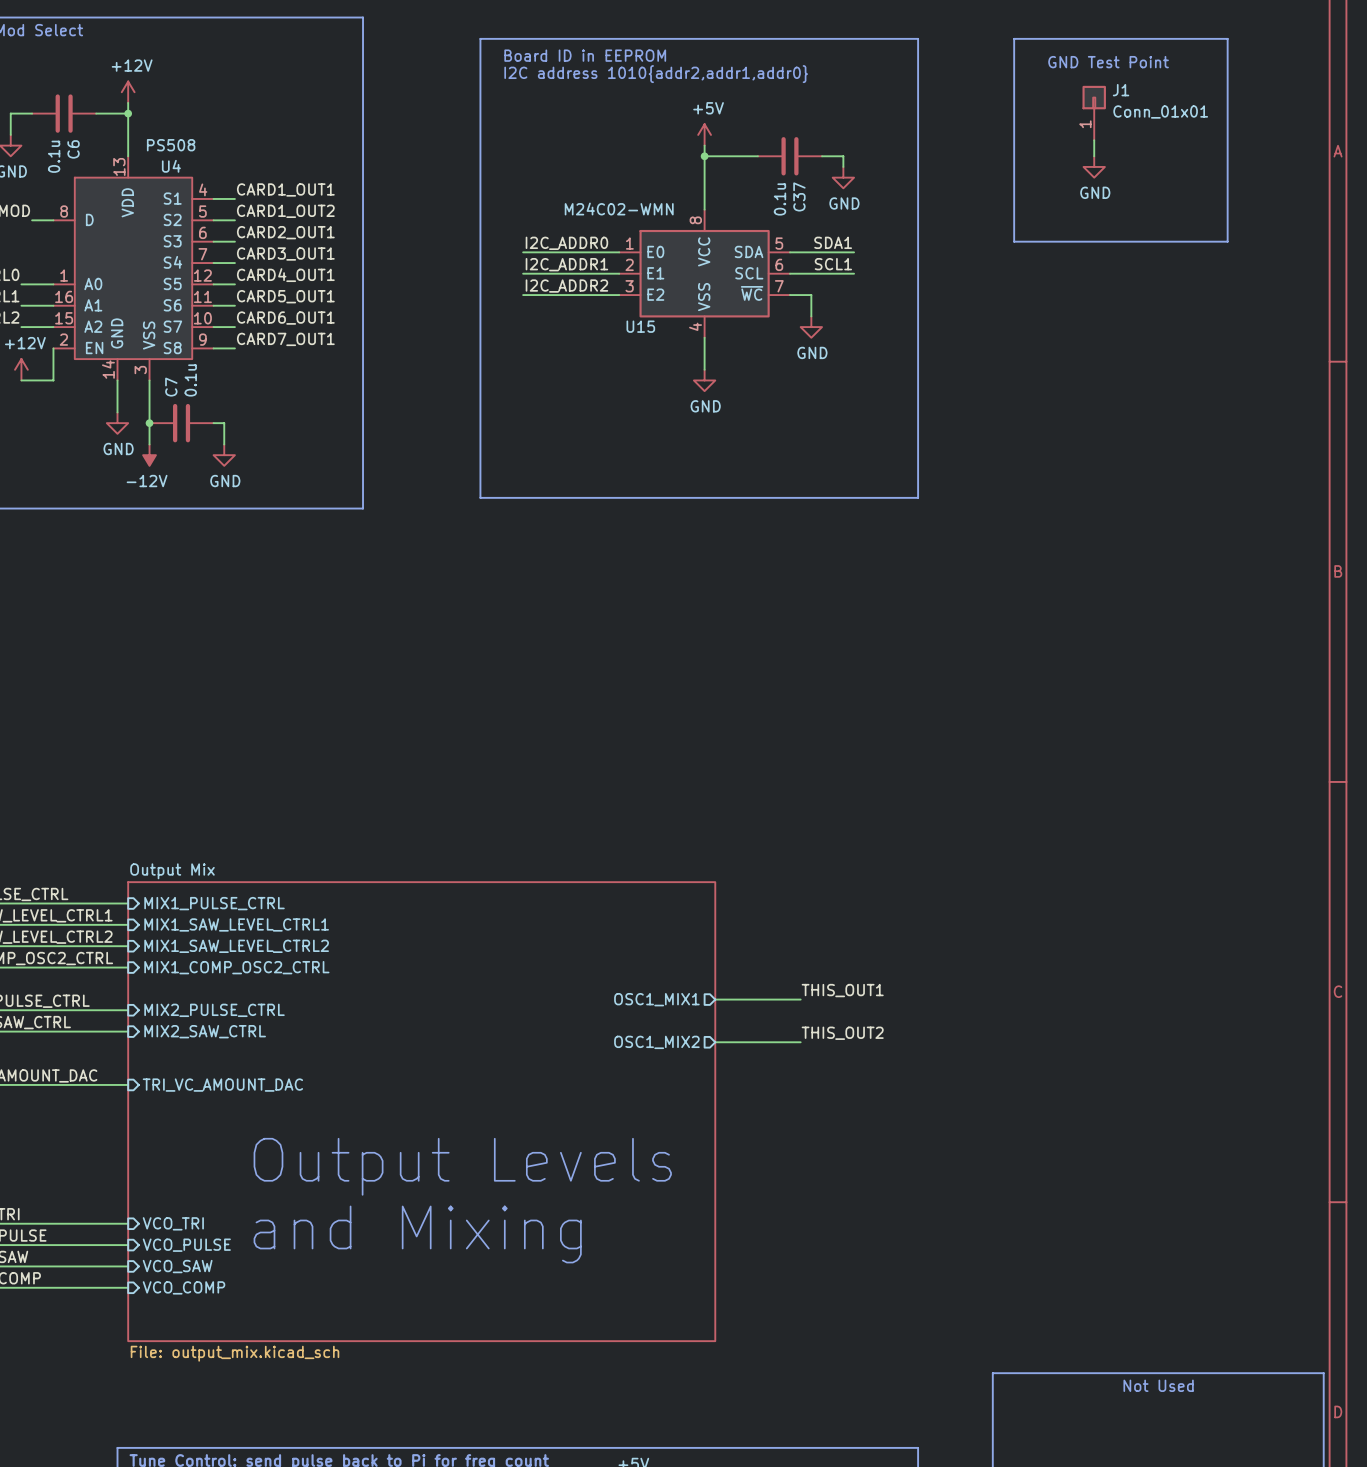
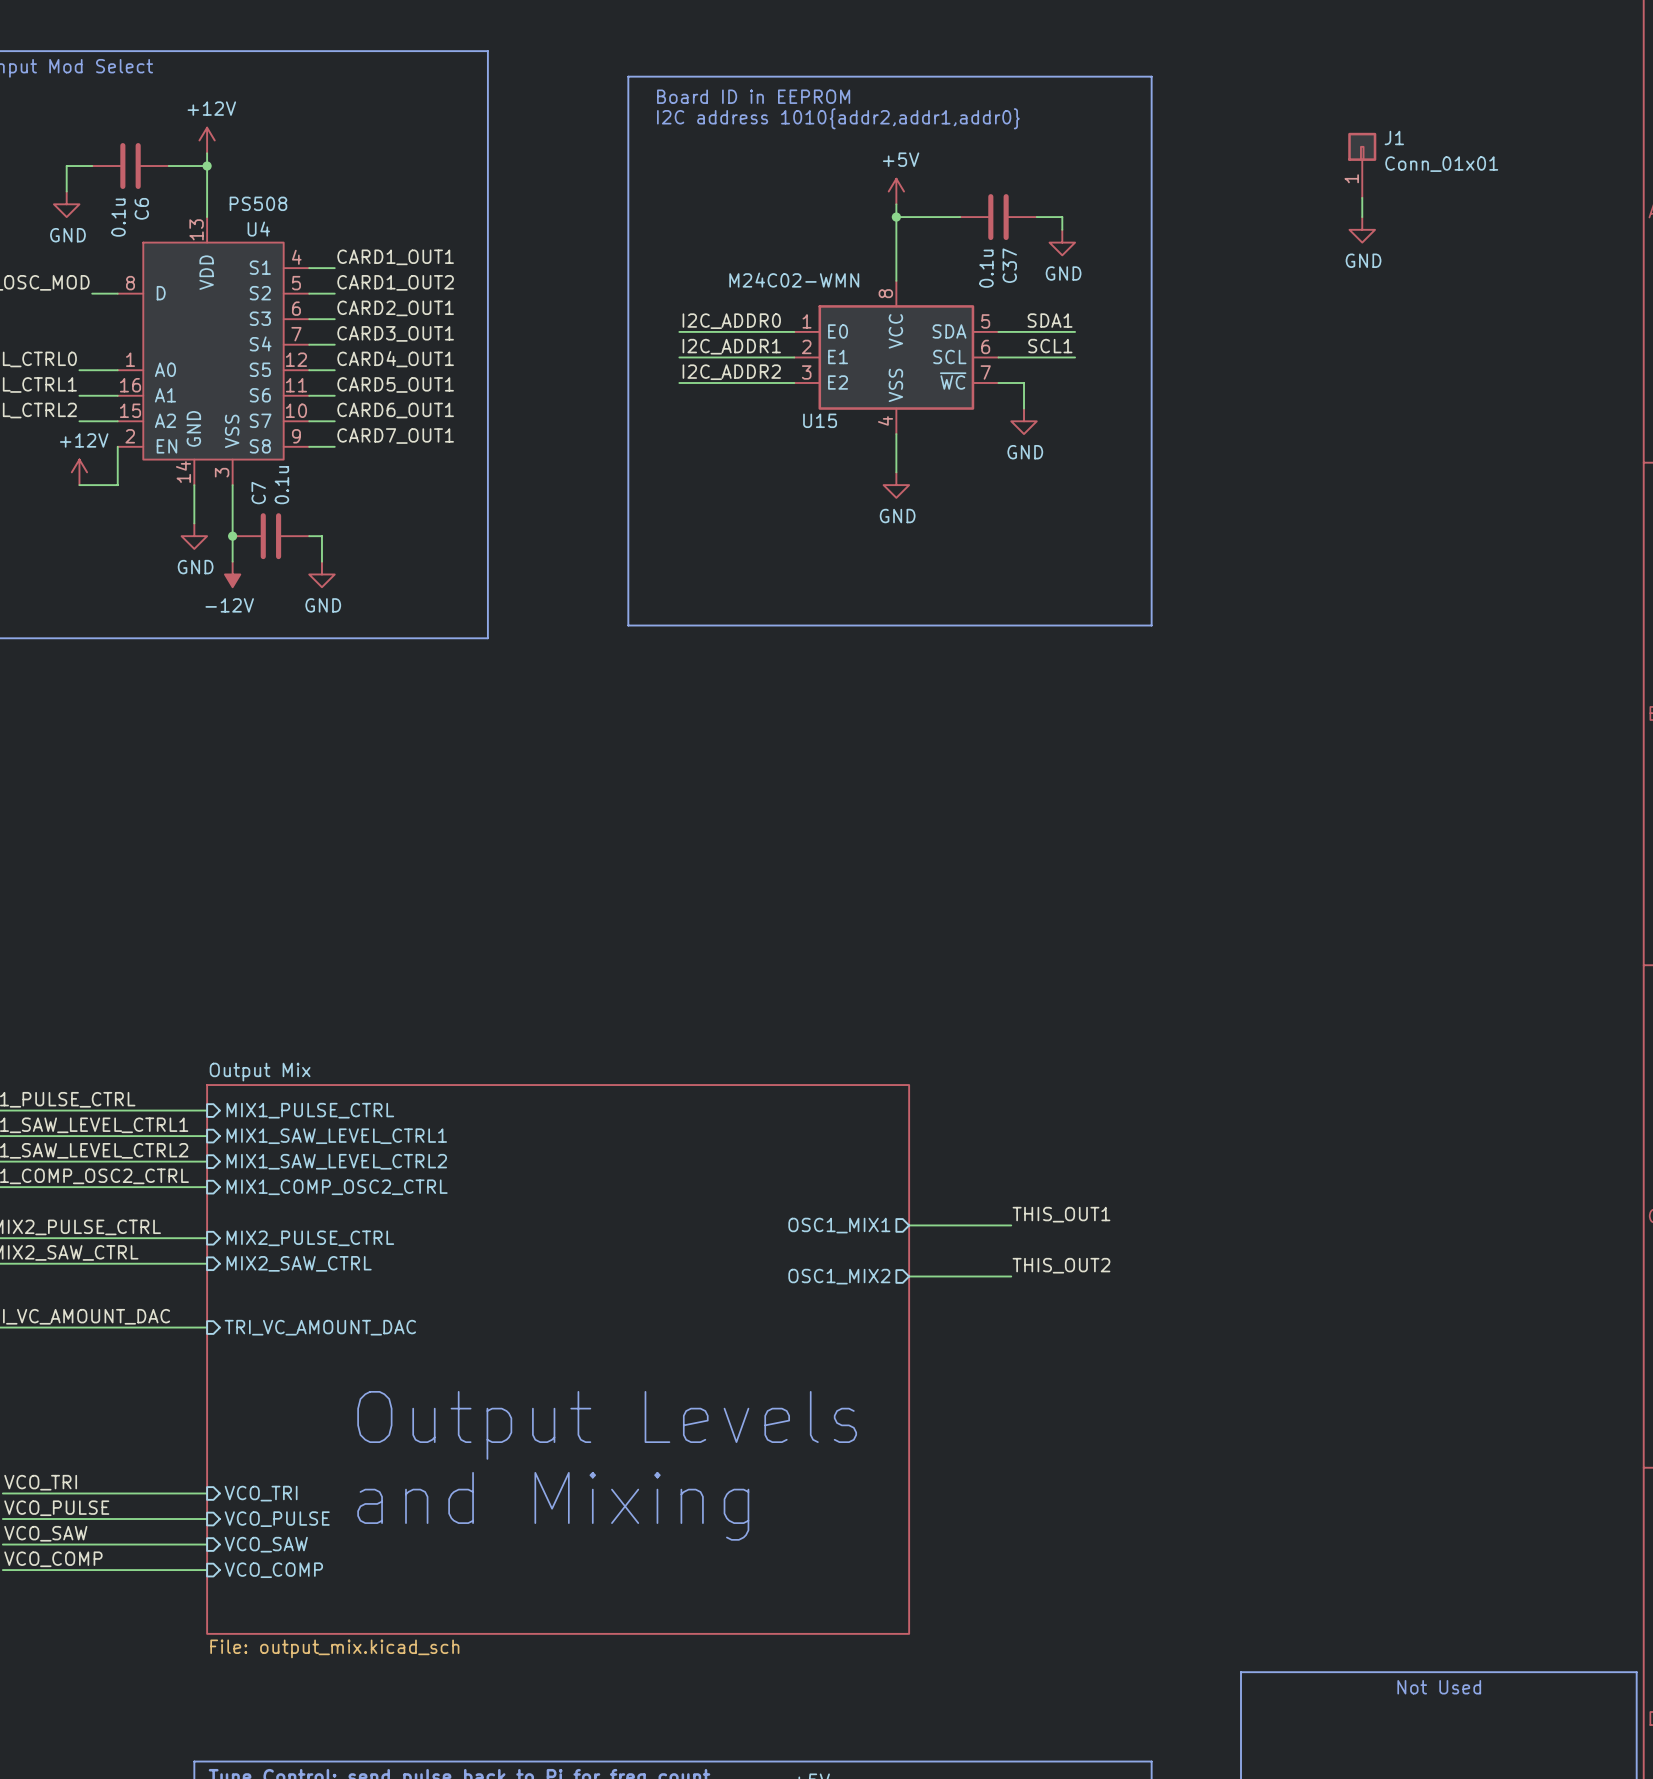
line: (1014, 38) (1227, 38) (1227, 241) (1014, 241) (1014, 38) -> none
text: GND Test Point (1108, 62) -> none

